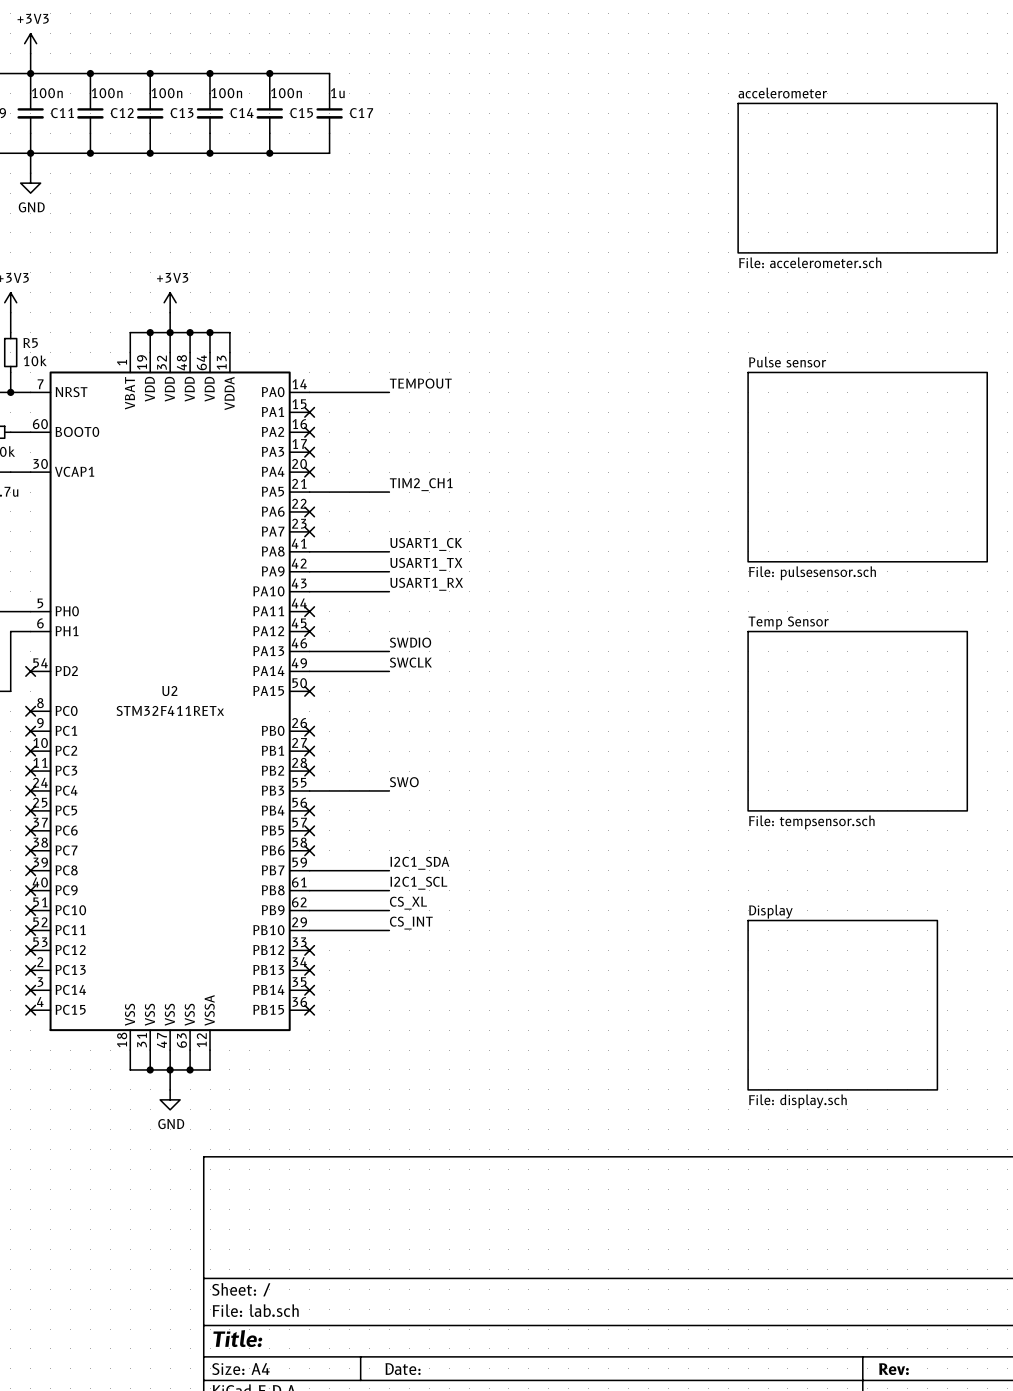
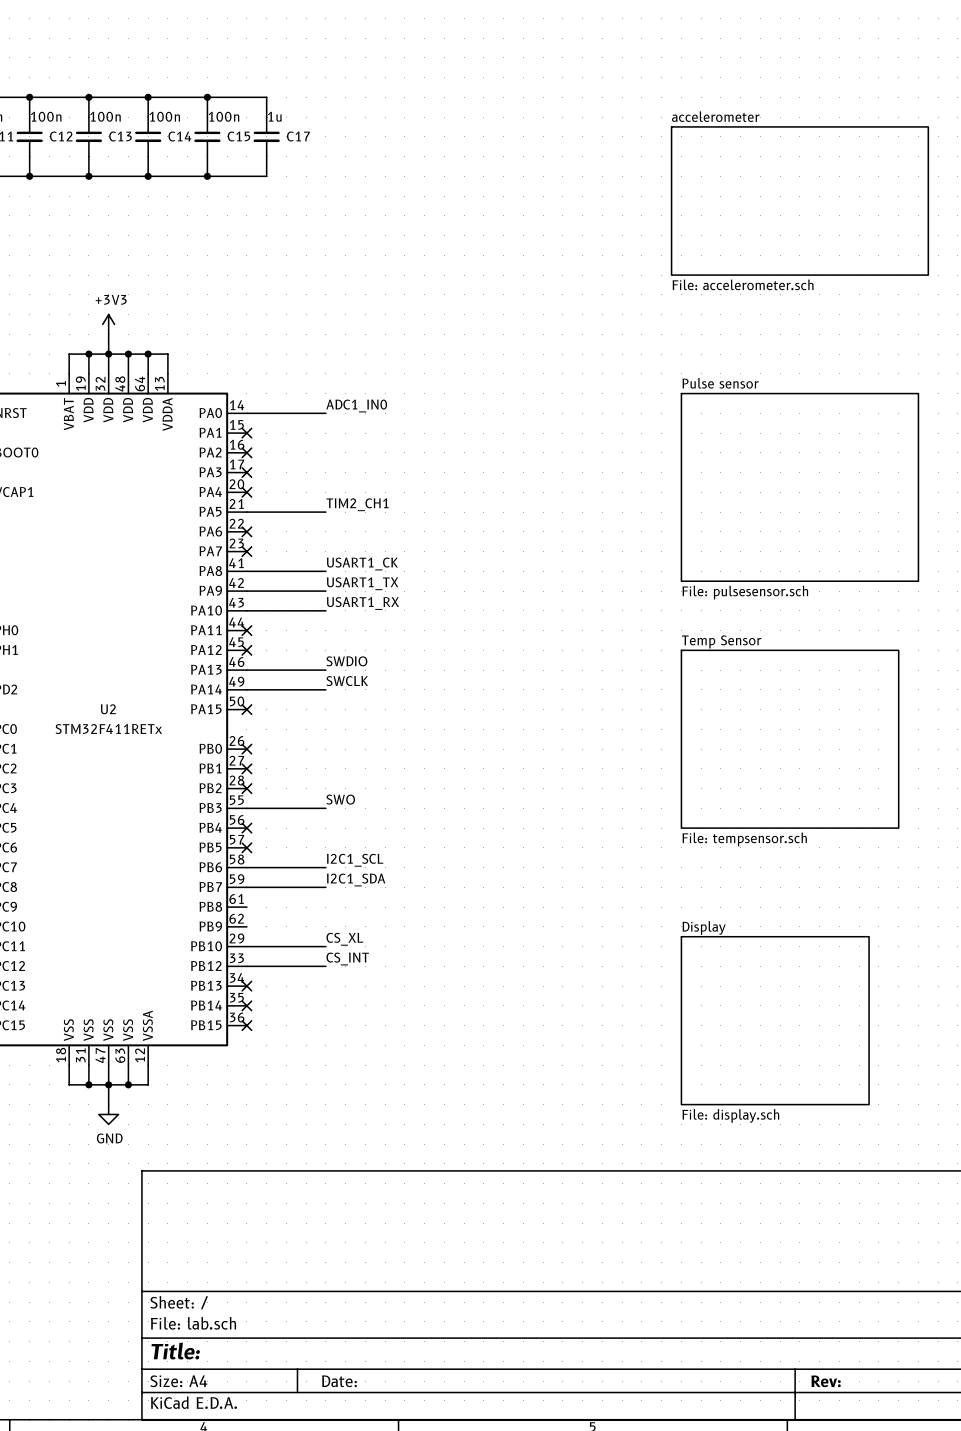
label: TEMPOUT (420, 383) -> ADC1_IN0 (356, 405)
no-connect mark: (309, 850) -> none
label position: I2C1_SCL (418, 883) -> I2C1_SCL (355, 860)
wire: (309, 890) (389, 890) -> (246, 867) (325, 867)
label: CS_XL (408, 903) -> none
wire: (309, 910) (389, 910) -> (246, 966) (325, 966)
label: CS_INT (411, 923) -> CS_XL (344, 939)
label: none -> CS_INT (347, 959)
no-connect mark: (309, 950) -> none

